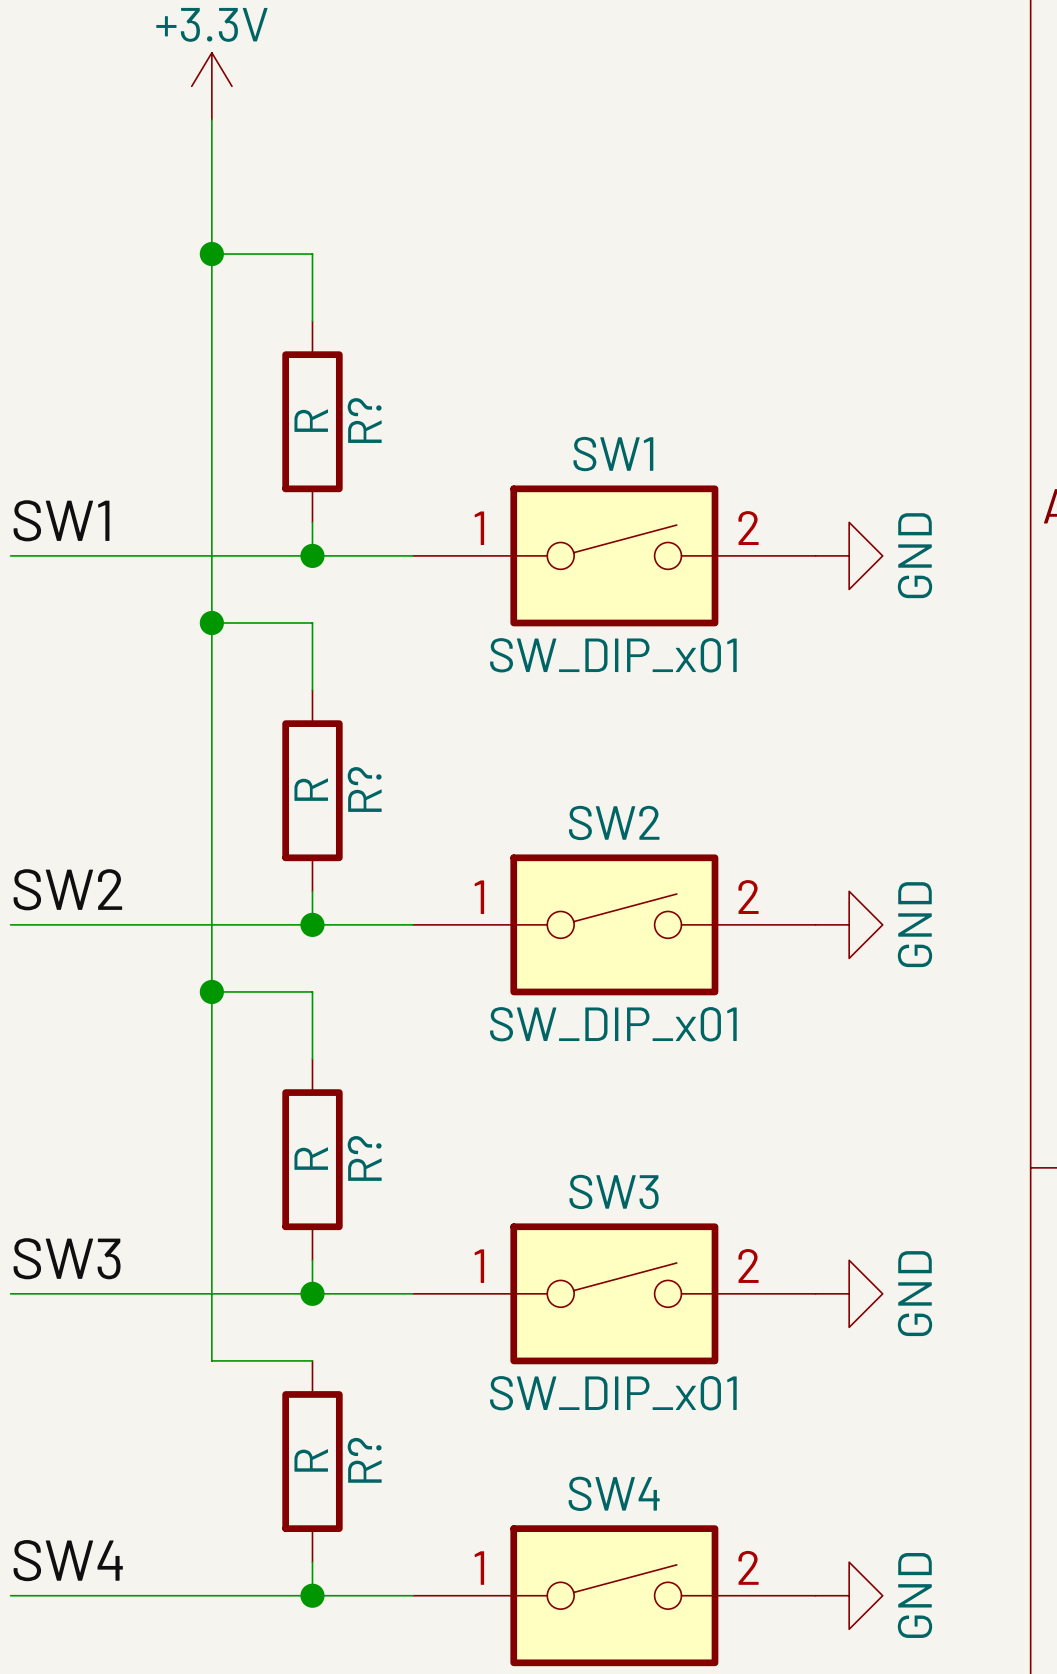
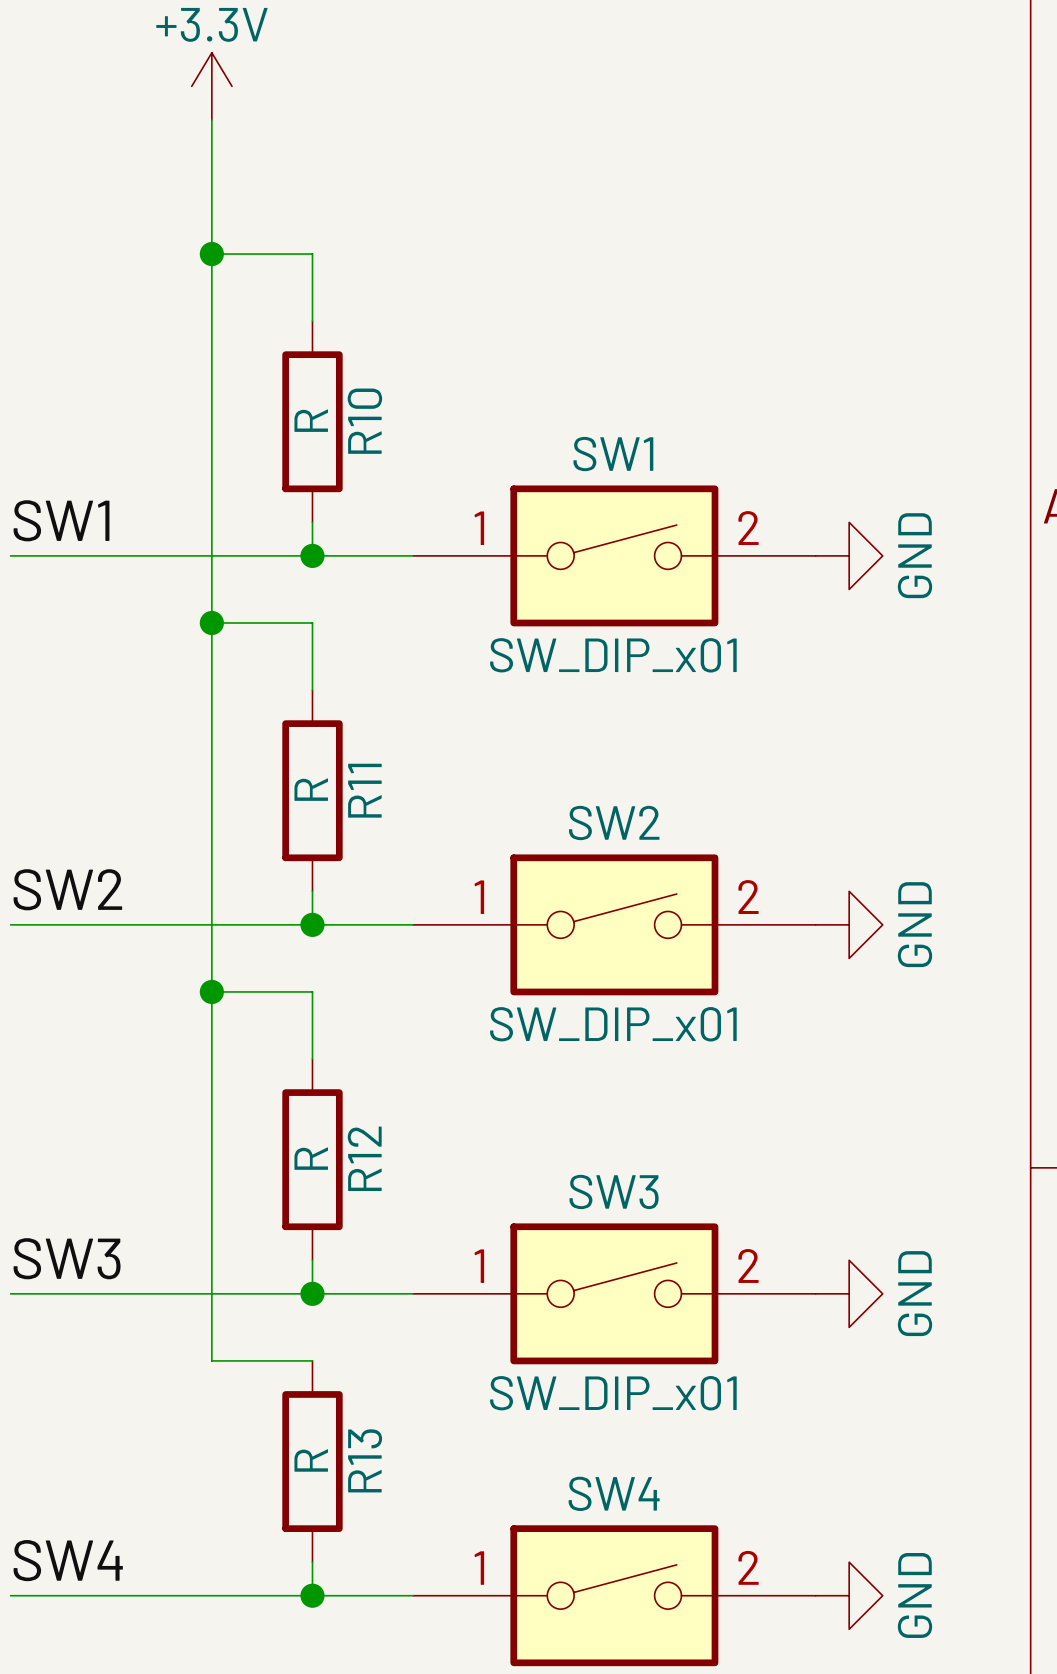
R? name: R? (364, 420) -> R10 (364, 421)
R? name: R? (364, 789) -> R11 (364, 790)
R? name: R? (364, 1158) -> R12 (364, 1158)
R? name: R? (364, 1460) -> R13 (365, 1460)

